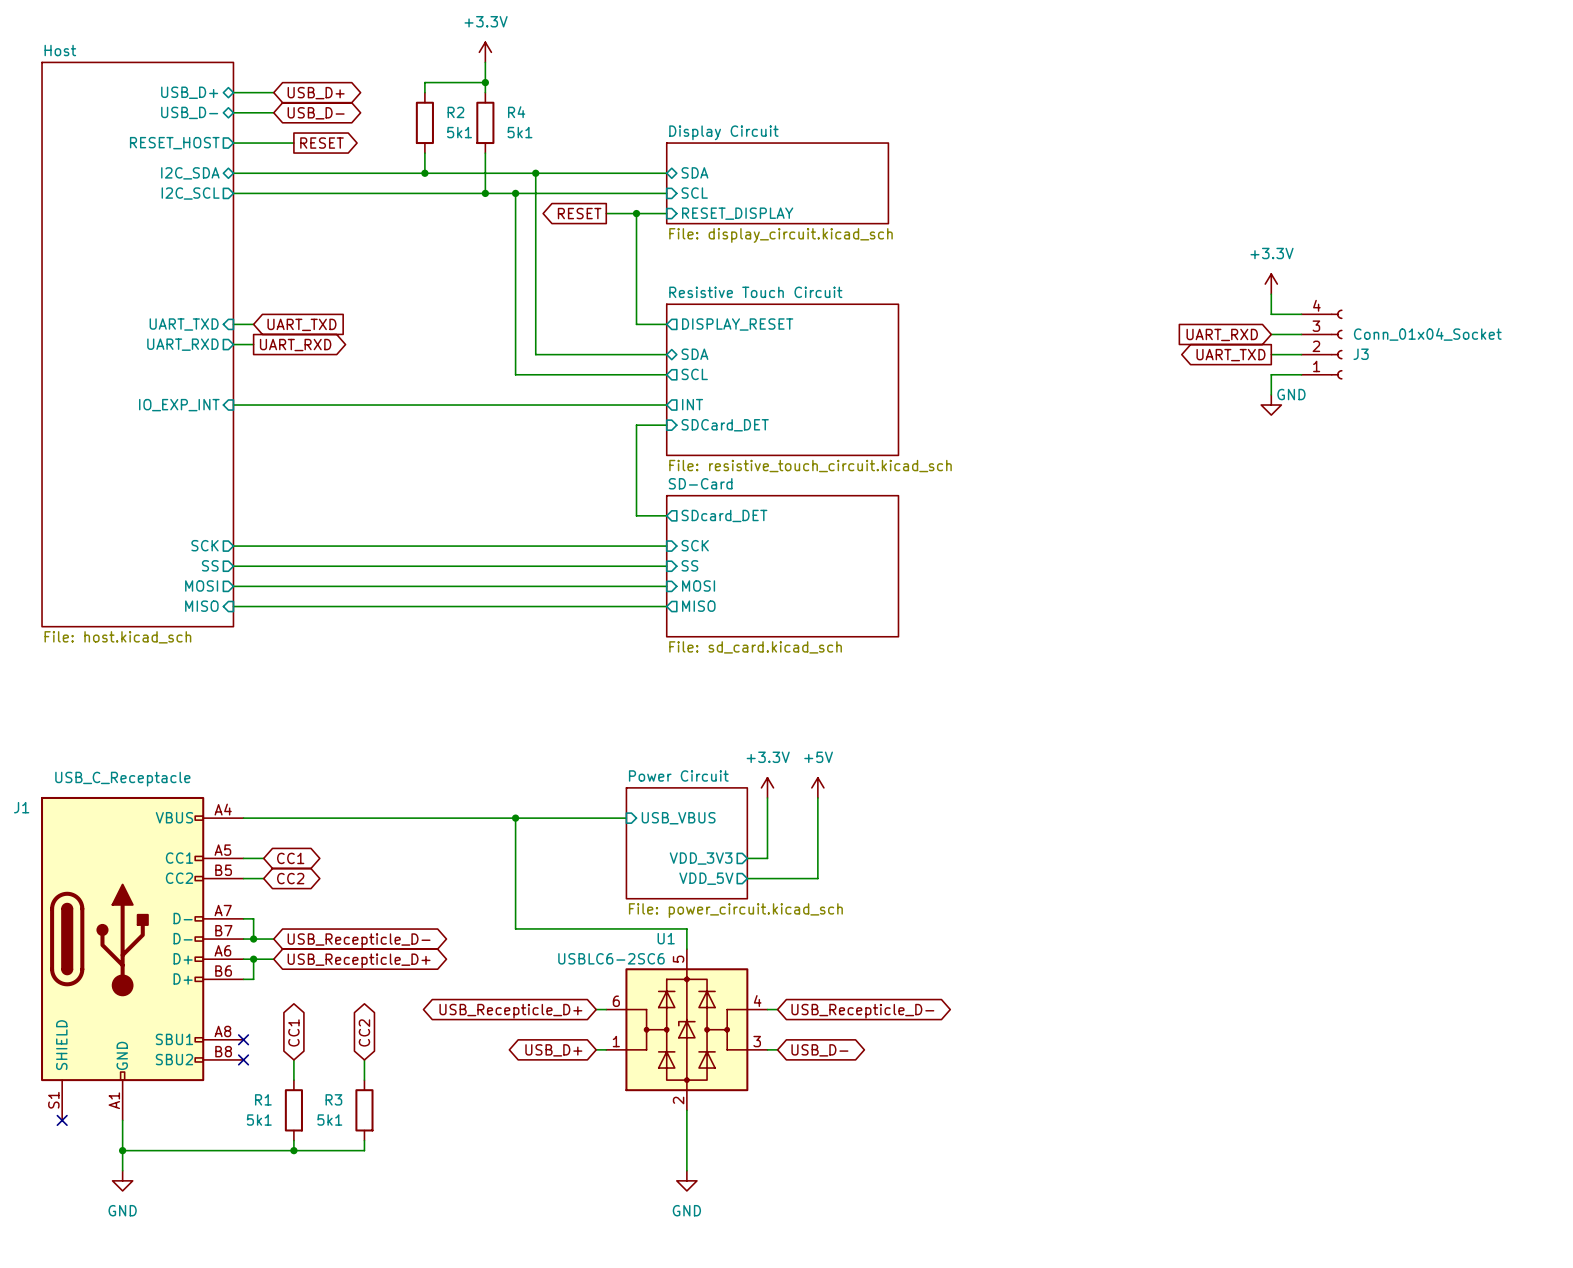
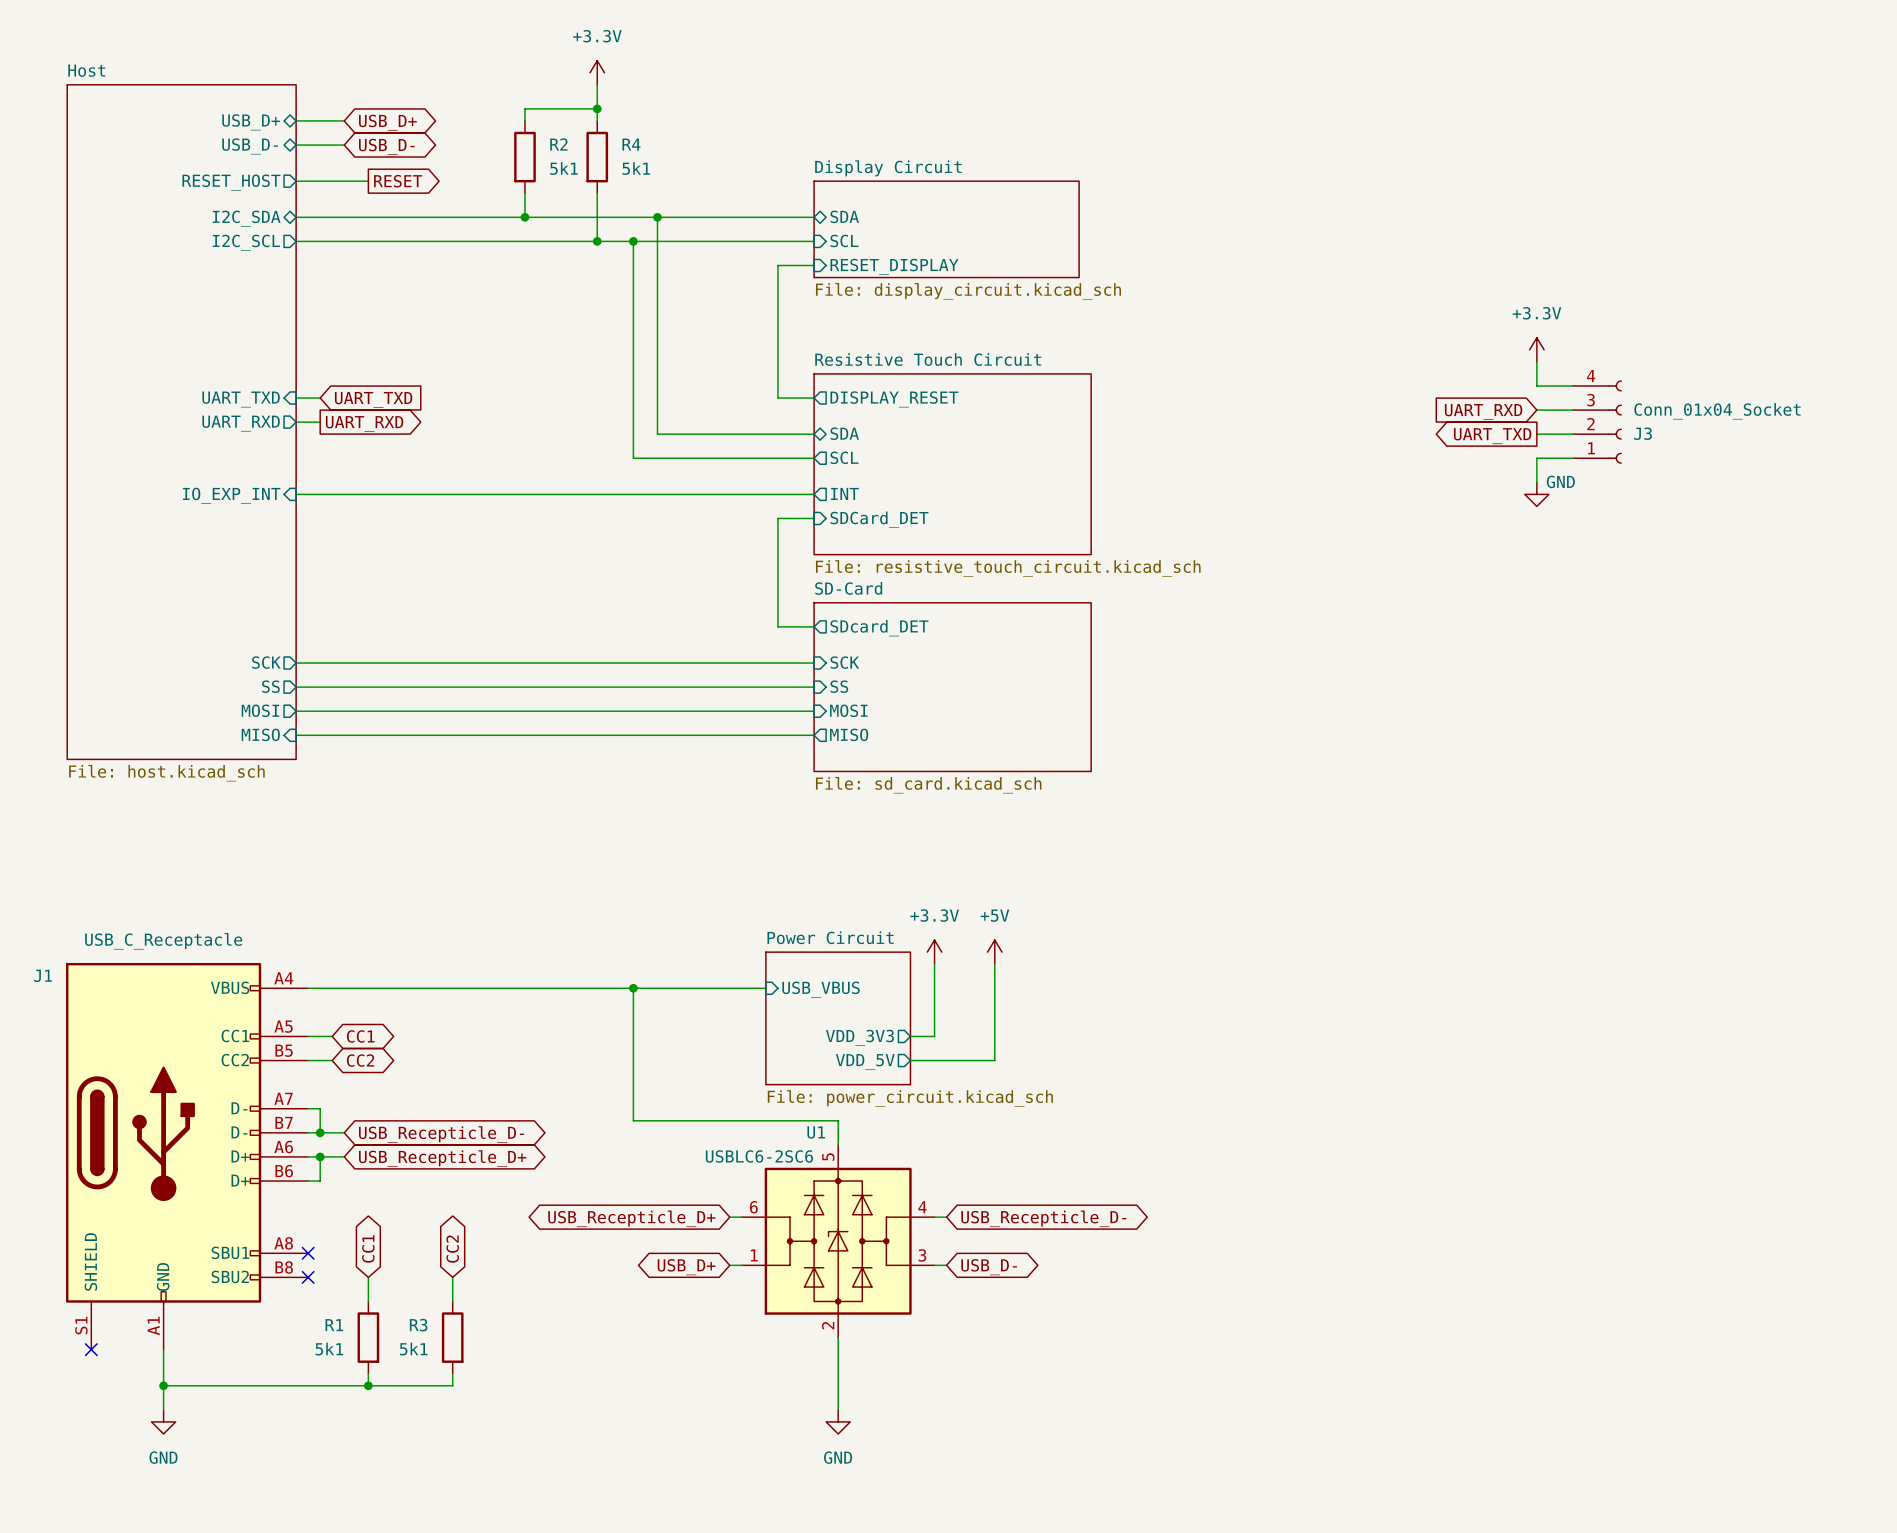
global label: RESET (579, 213) -> none
wire: (606, 213) (636, 213) -> none
junction: (636, 213) -> none

